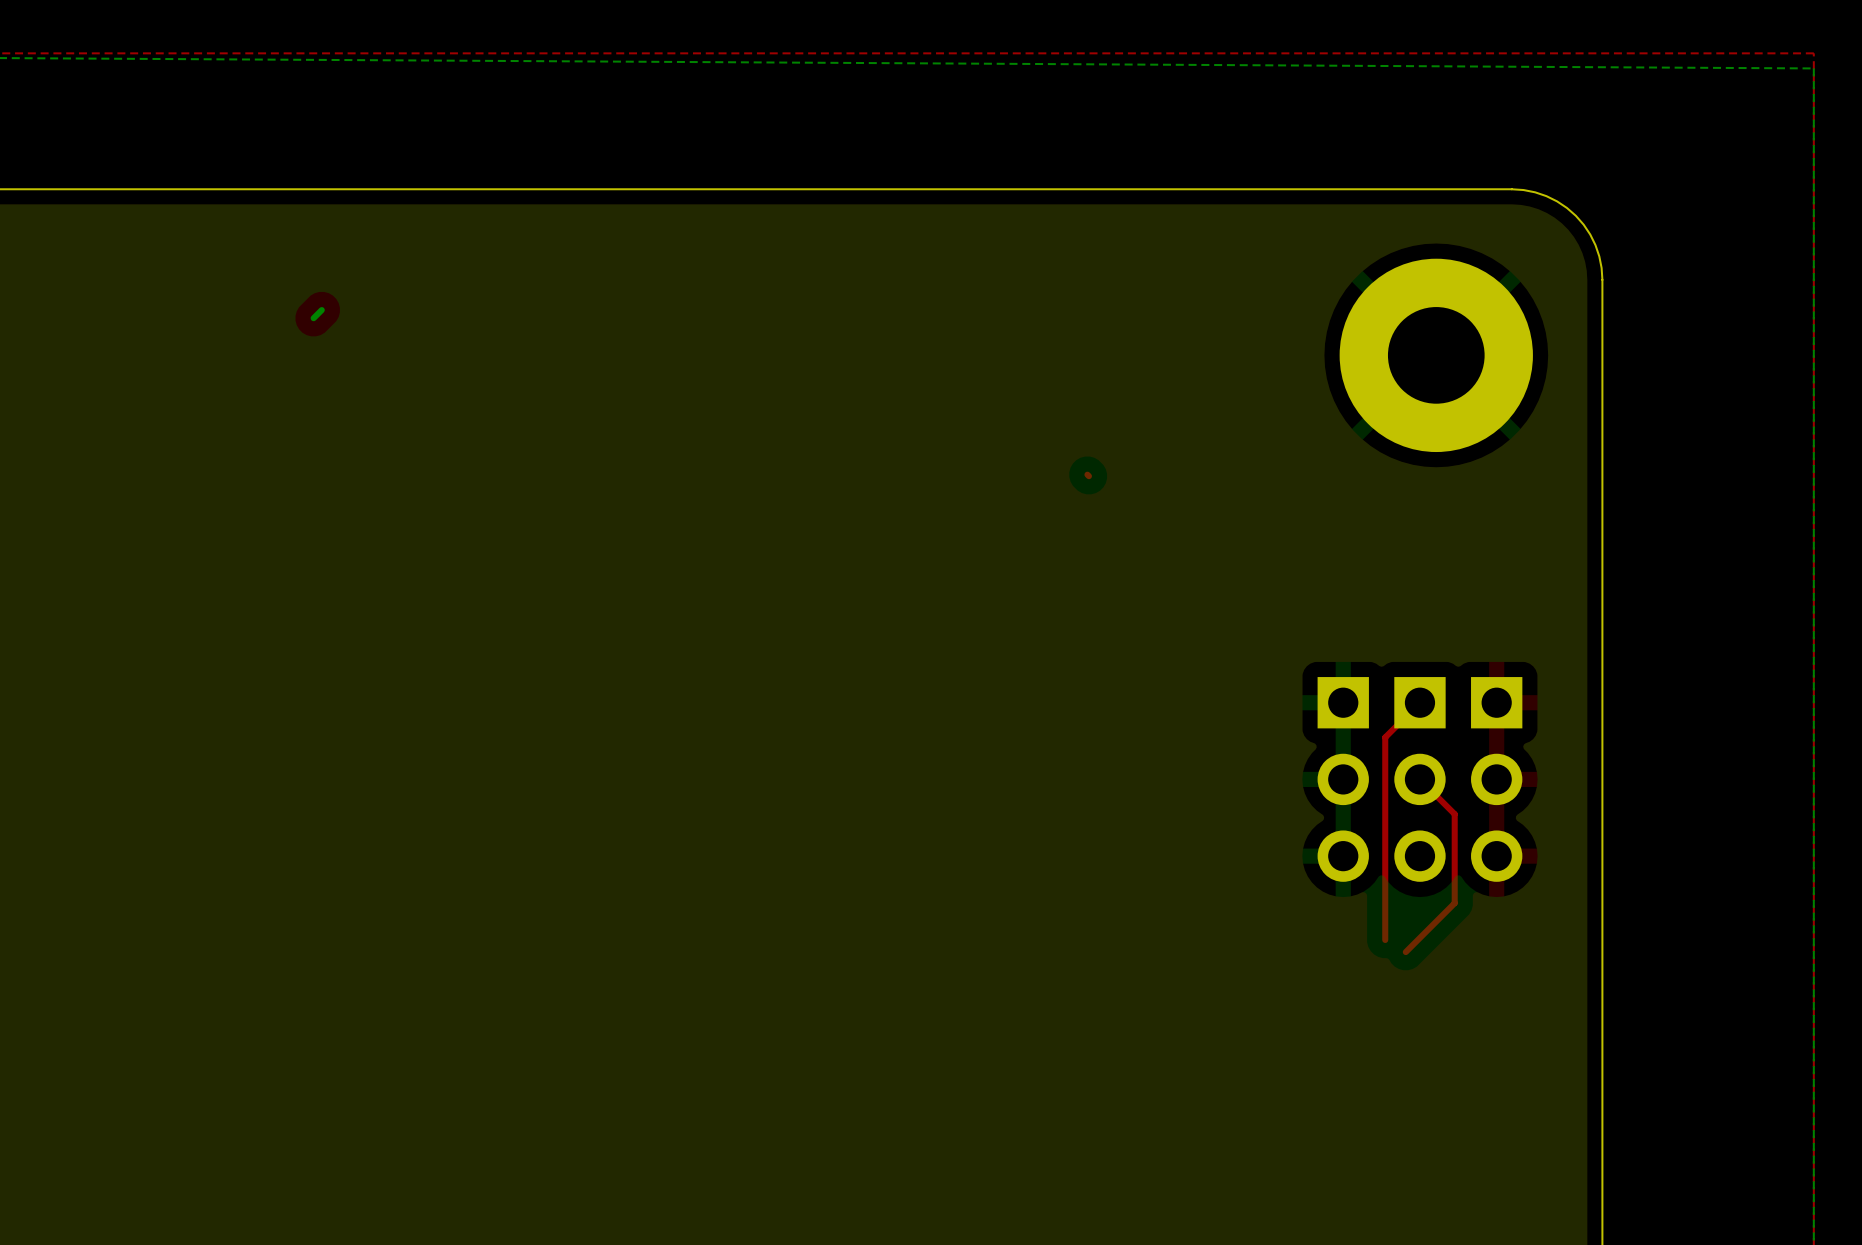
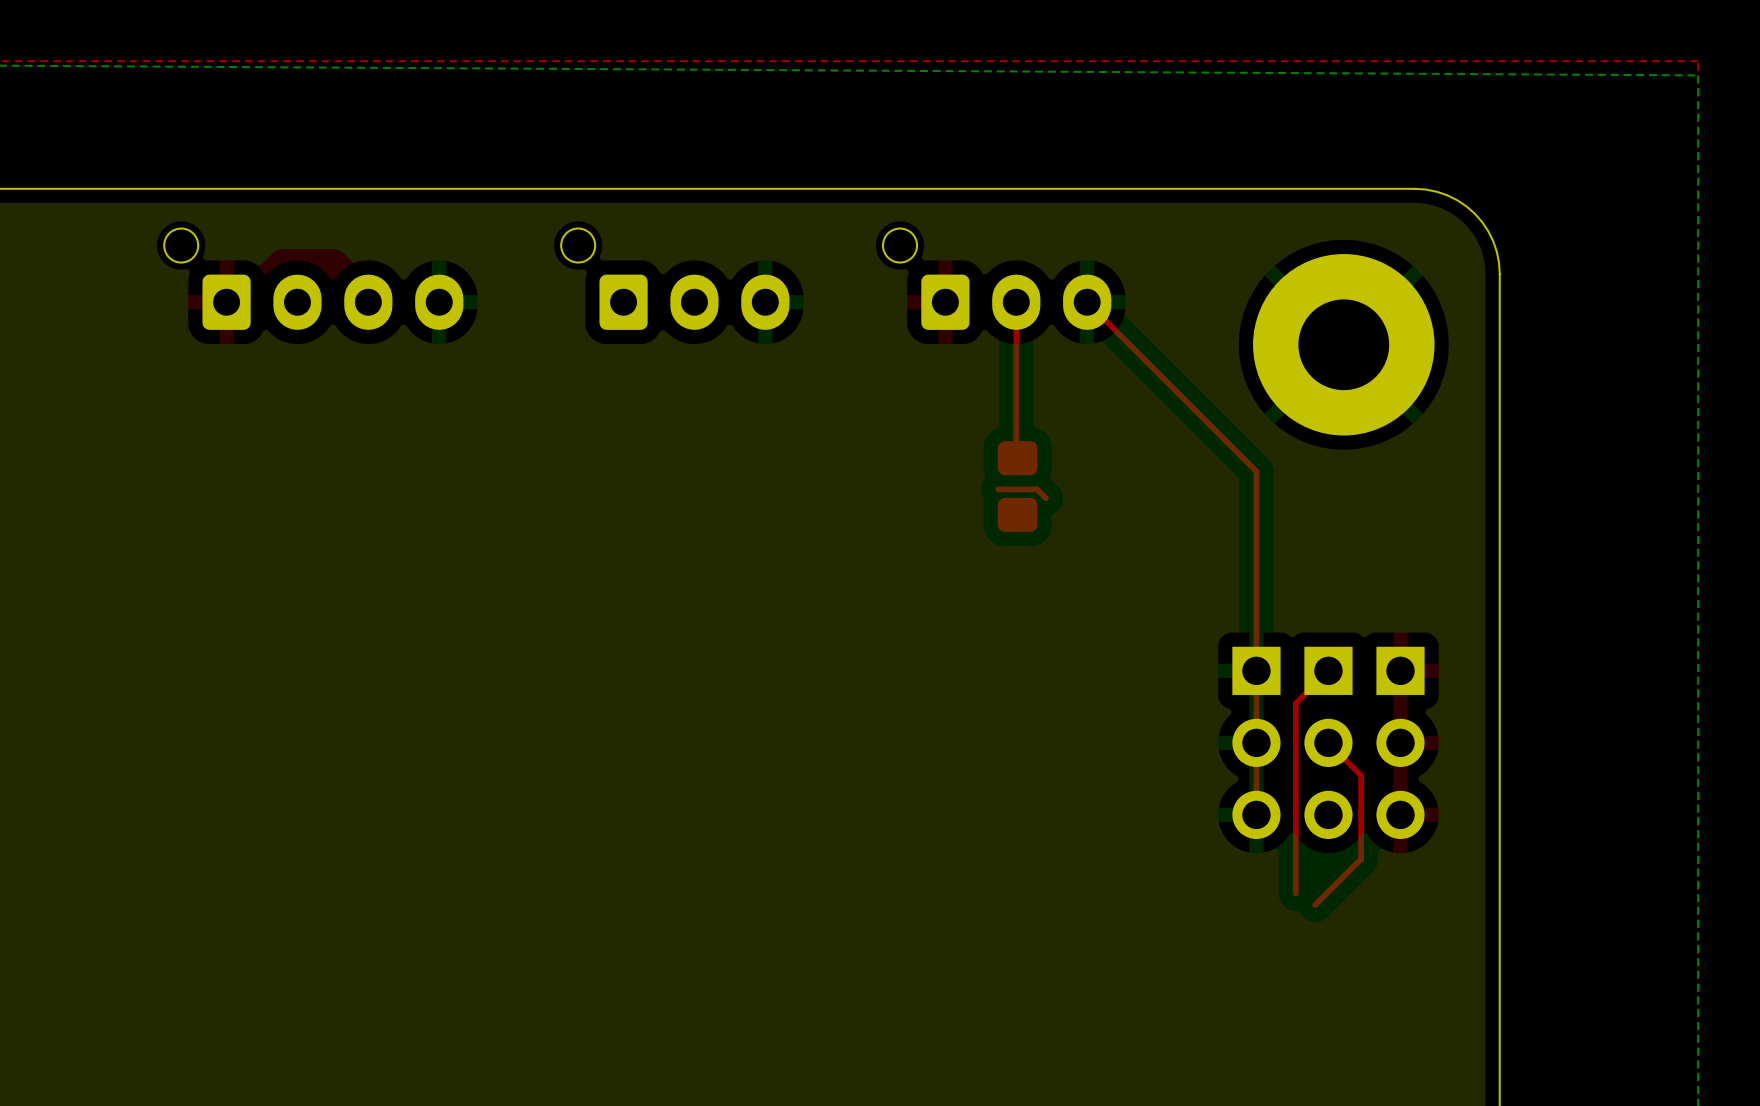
part: none -> (313, 279)
part: none -> (675, 279)
part: none -> (997, 279)
top track: none -> (1016, 302) (1016, 456)
top track: none -> (1087, 302) (1256, 471) (1256, 814)
part: none -> (1017, 486)
top track: none -> (998, 489) (1037, 489) (1046, 498)

